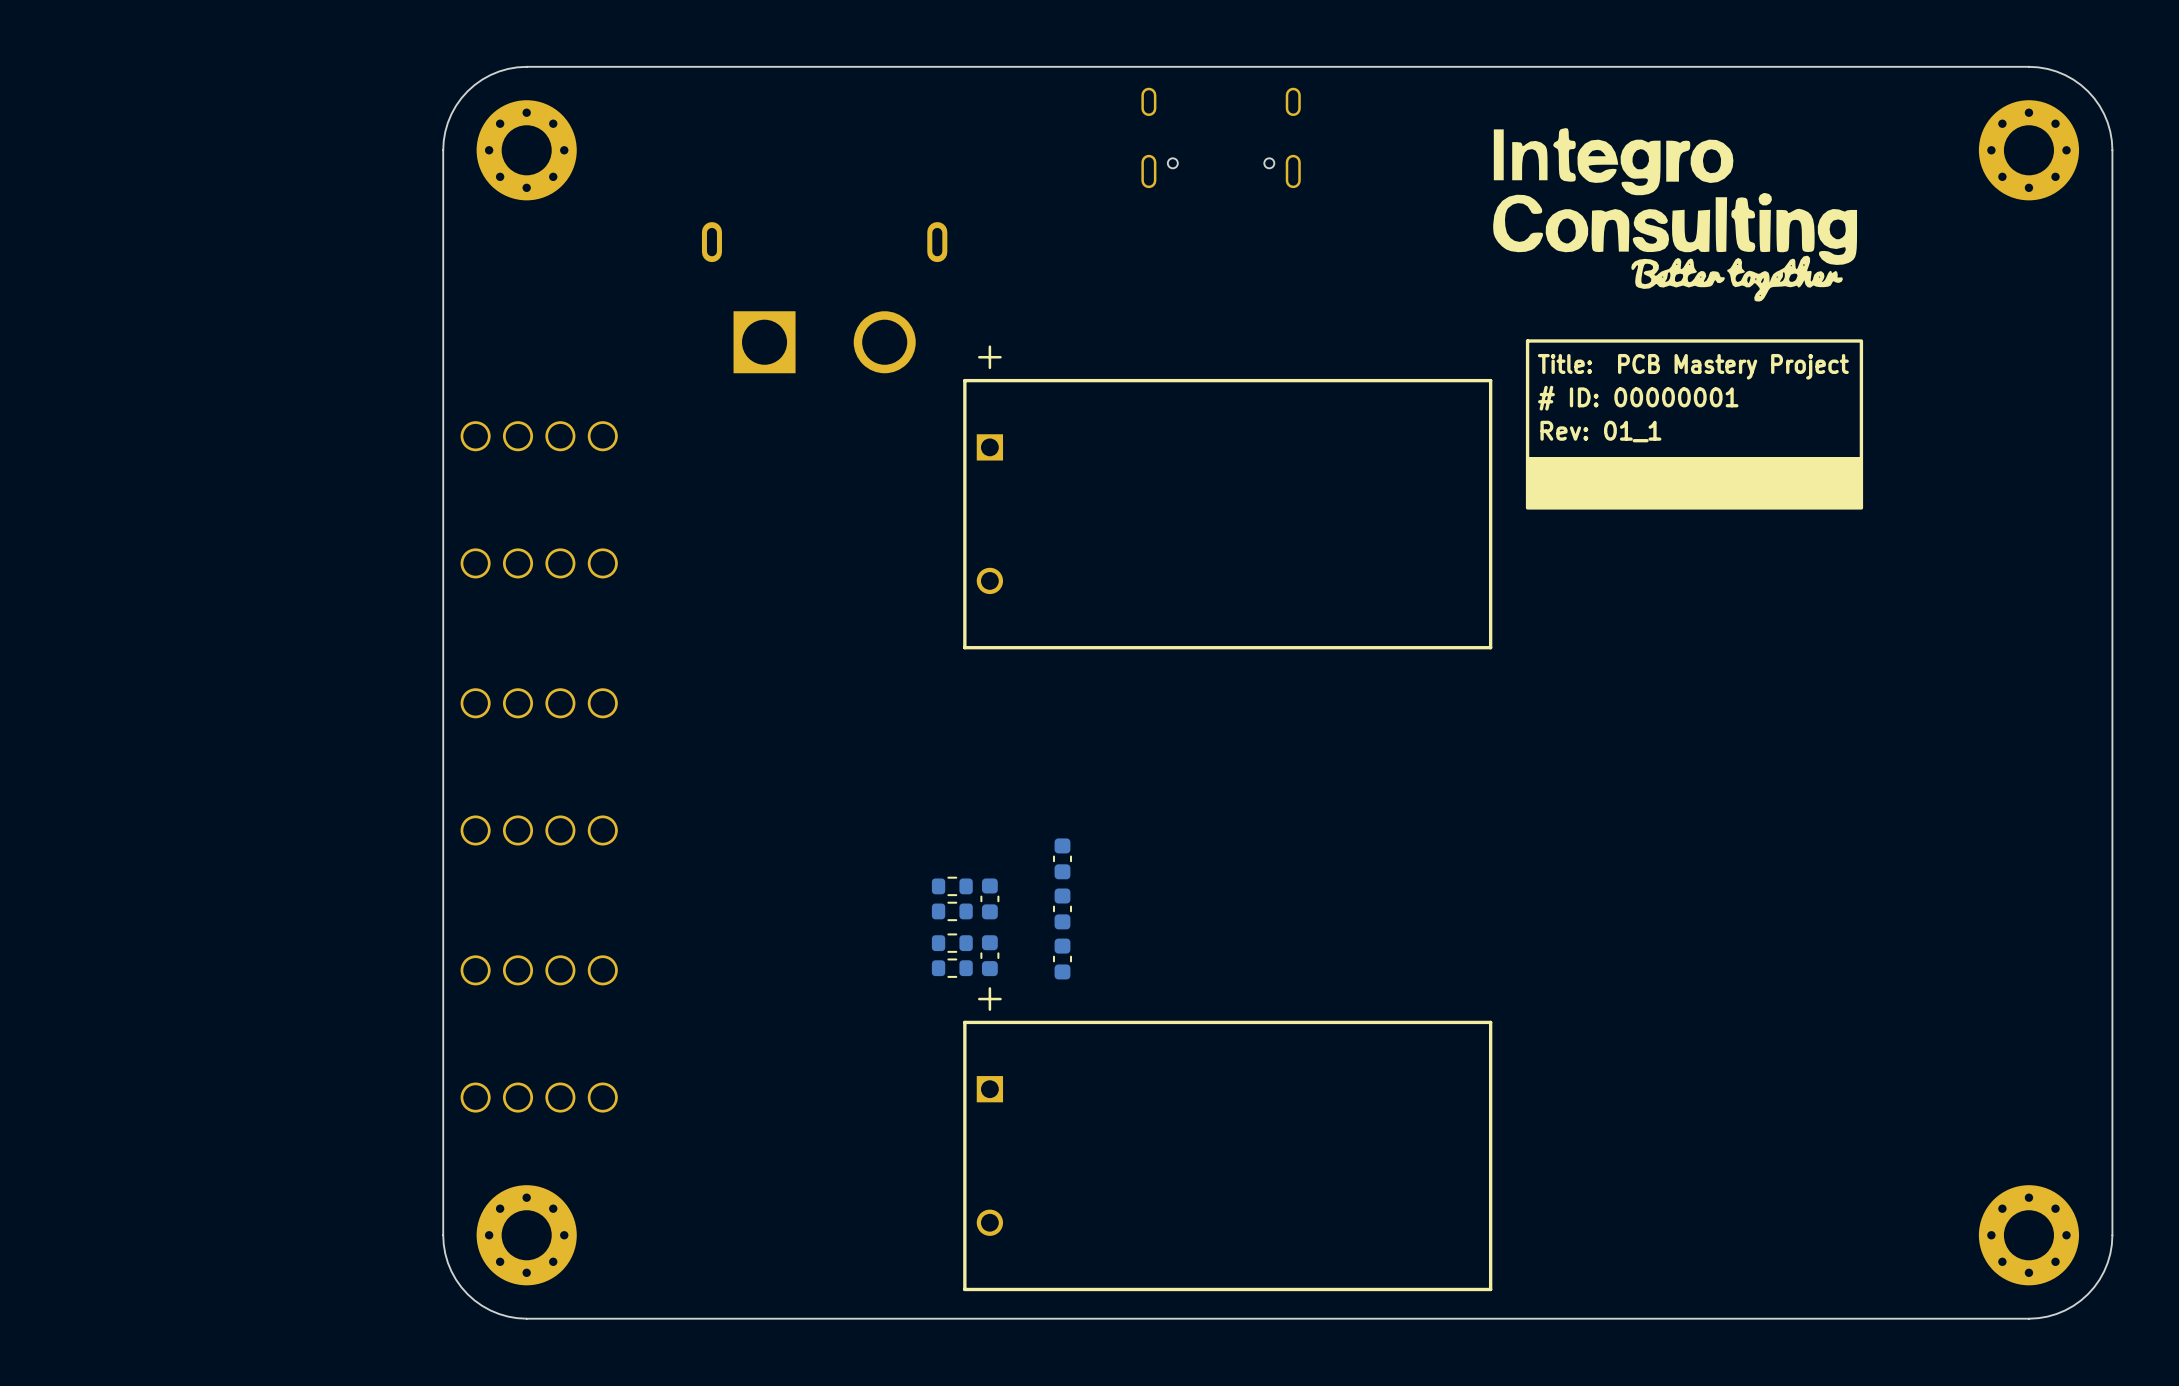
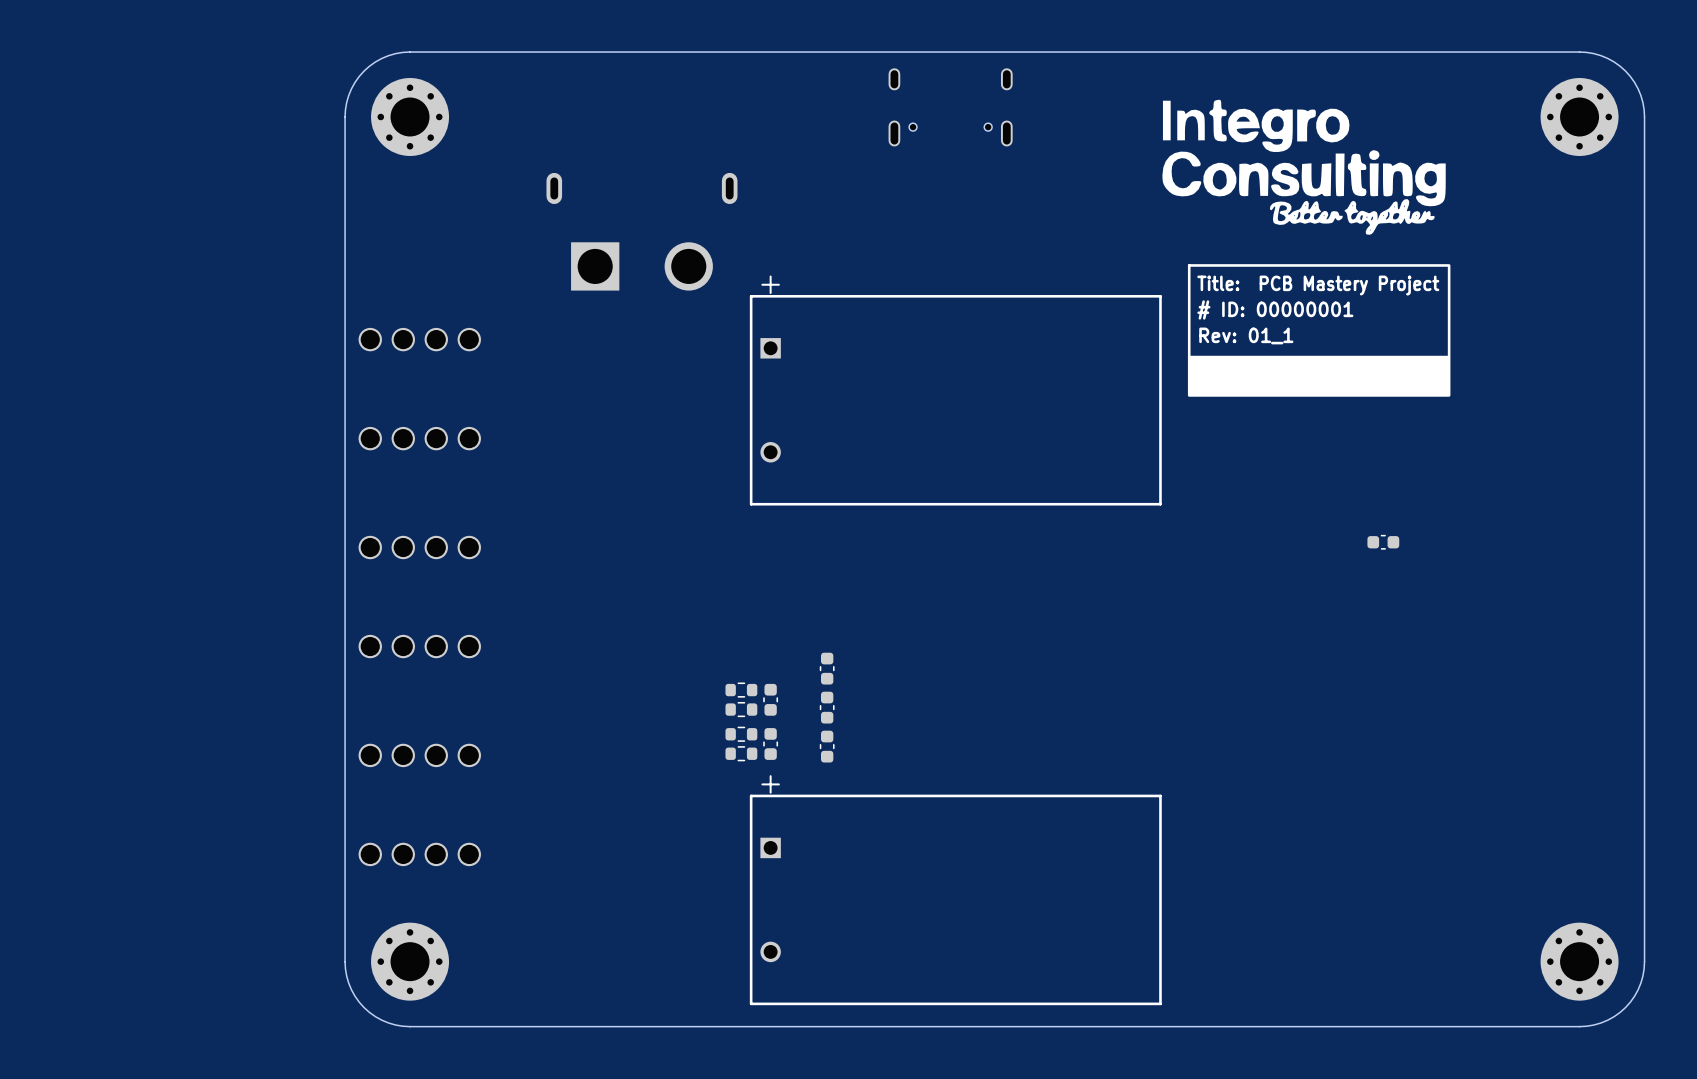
part footprint: [963, 345, 1493, 650] -> [749, 275, 1162, 506]
part: none -> (1383, 542)
part footprint: [963, 987, 1493, 1292] -> [749, 775, 1162, 1006]

